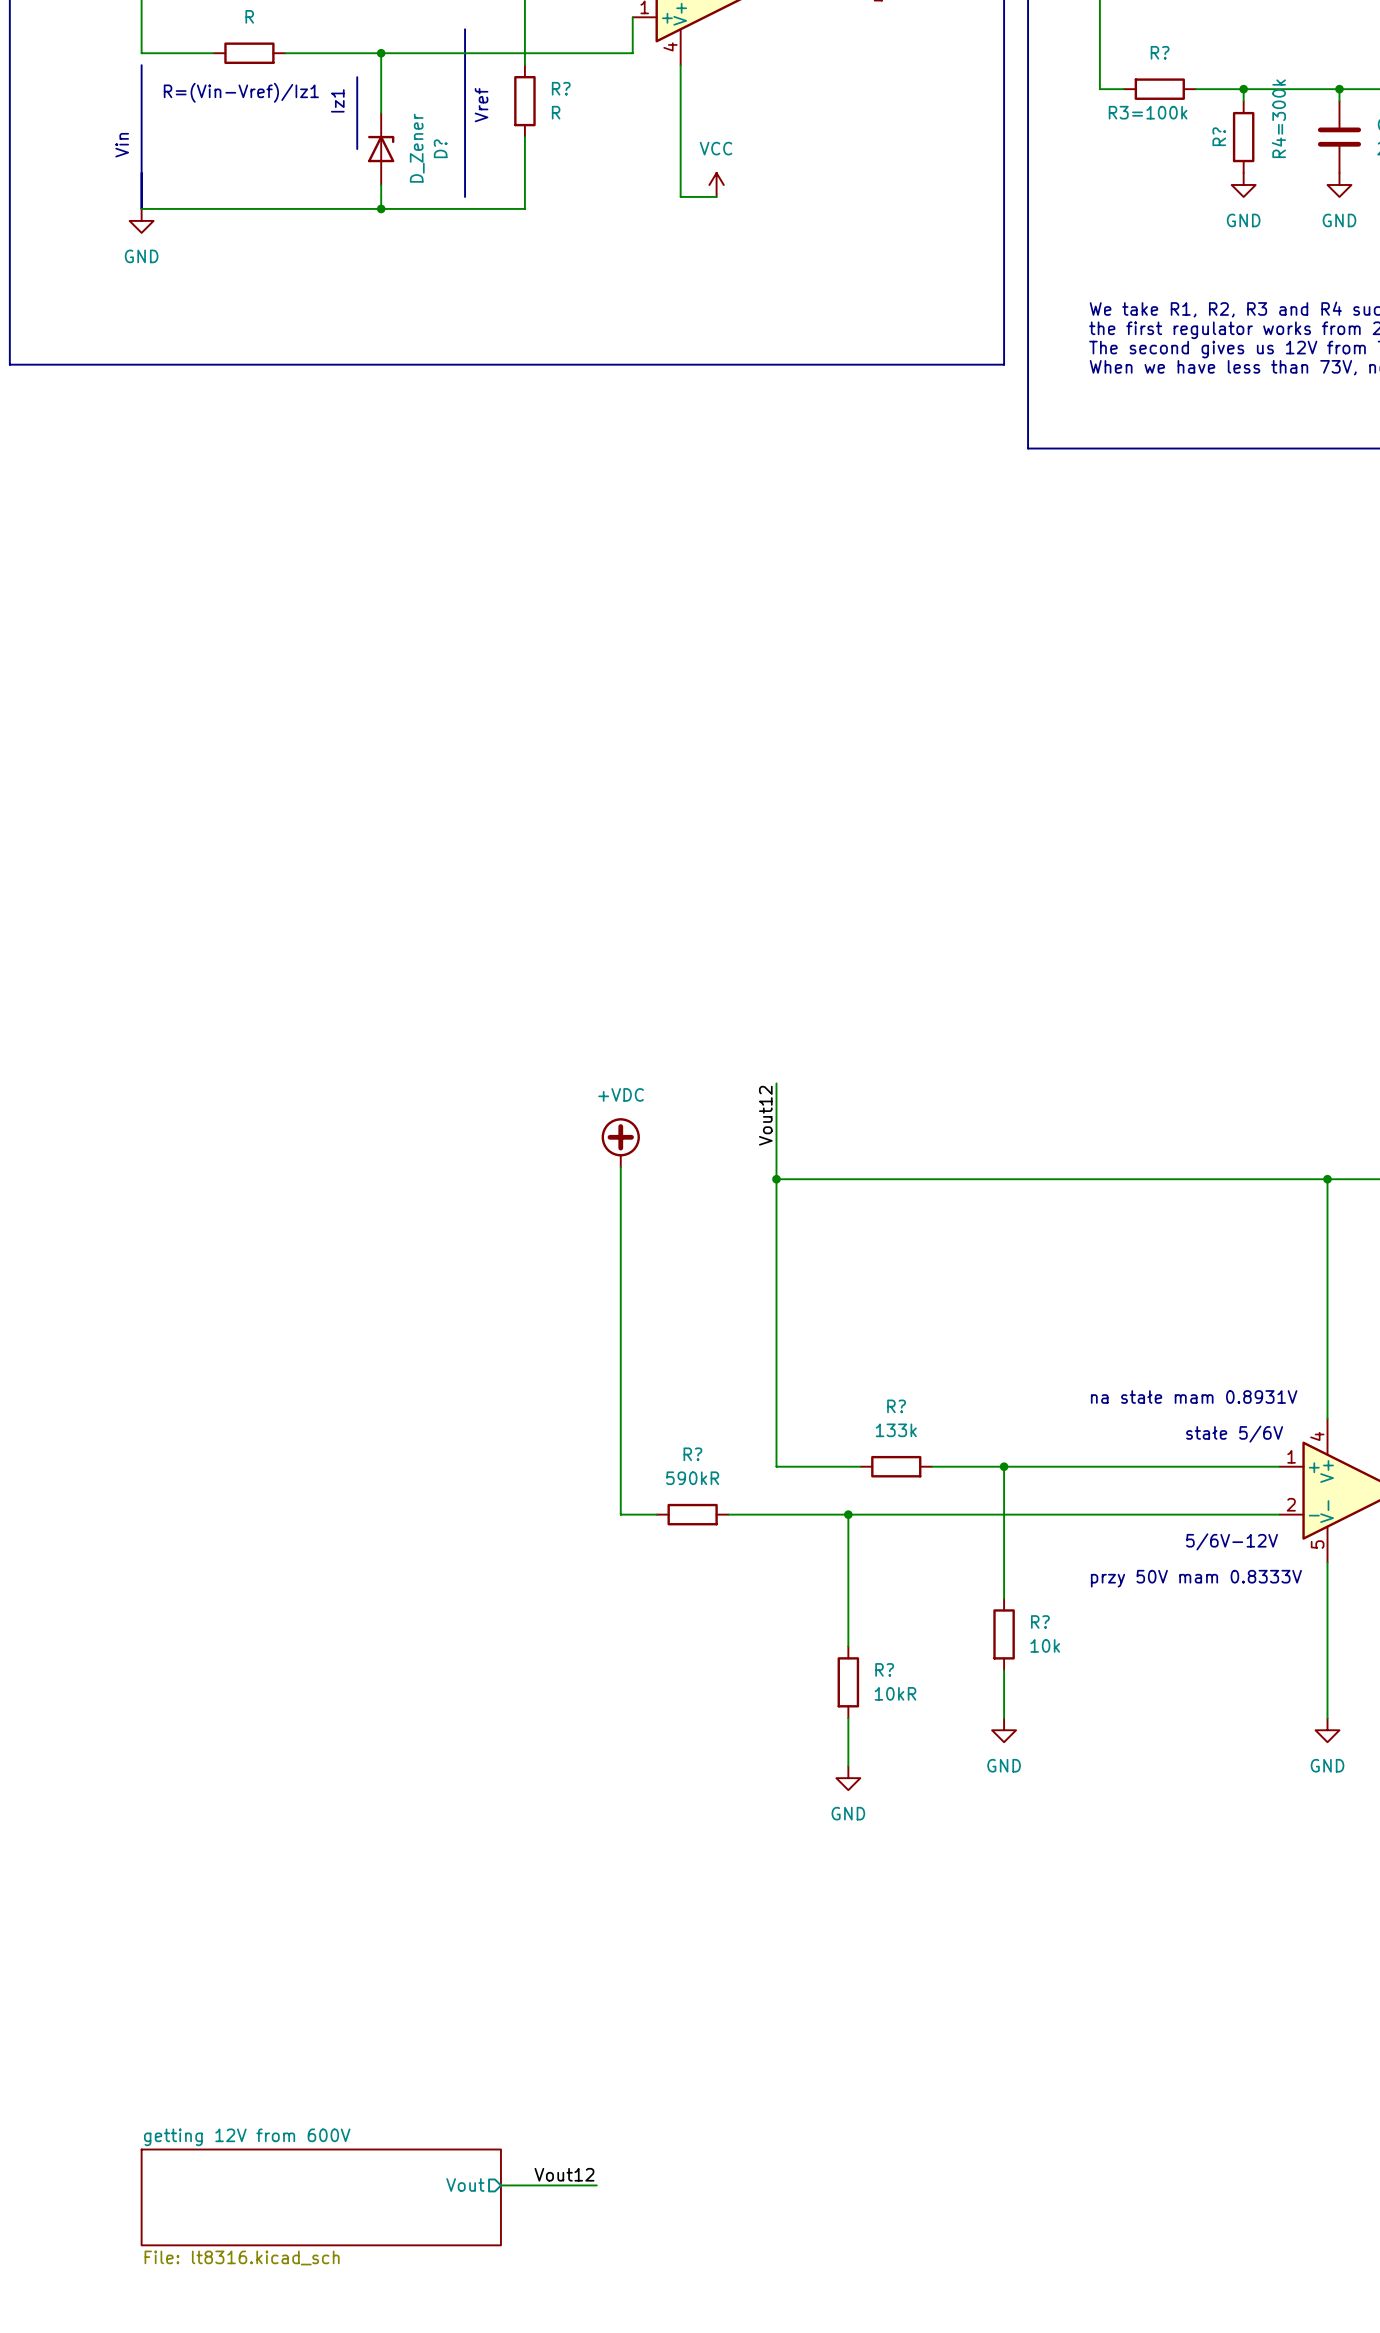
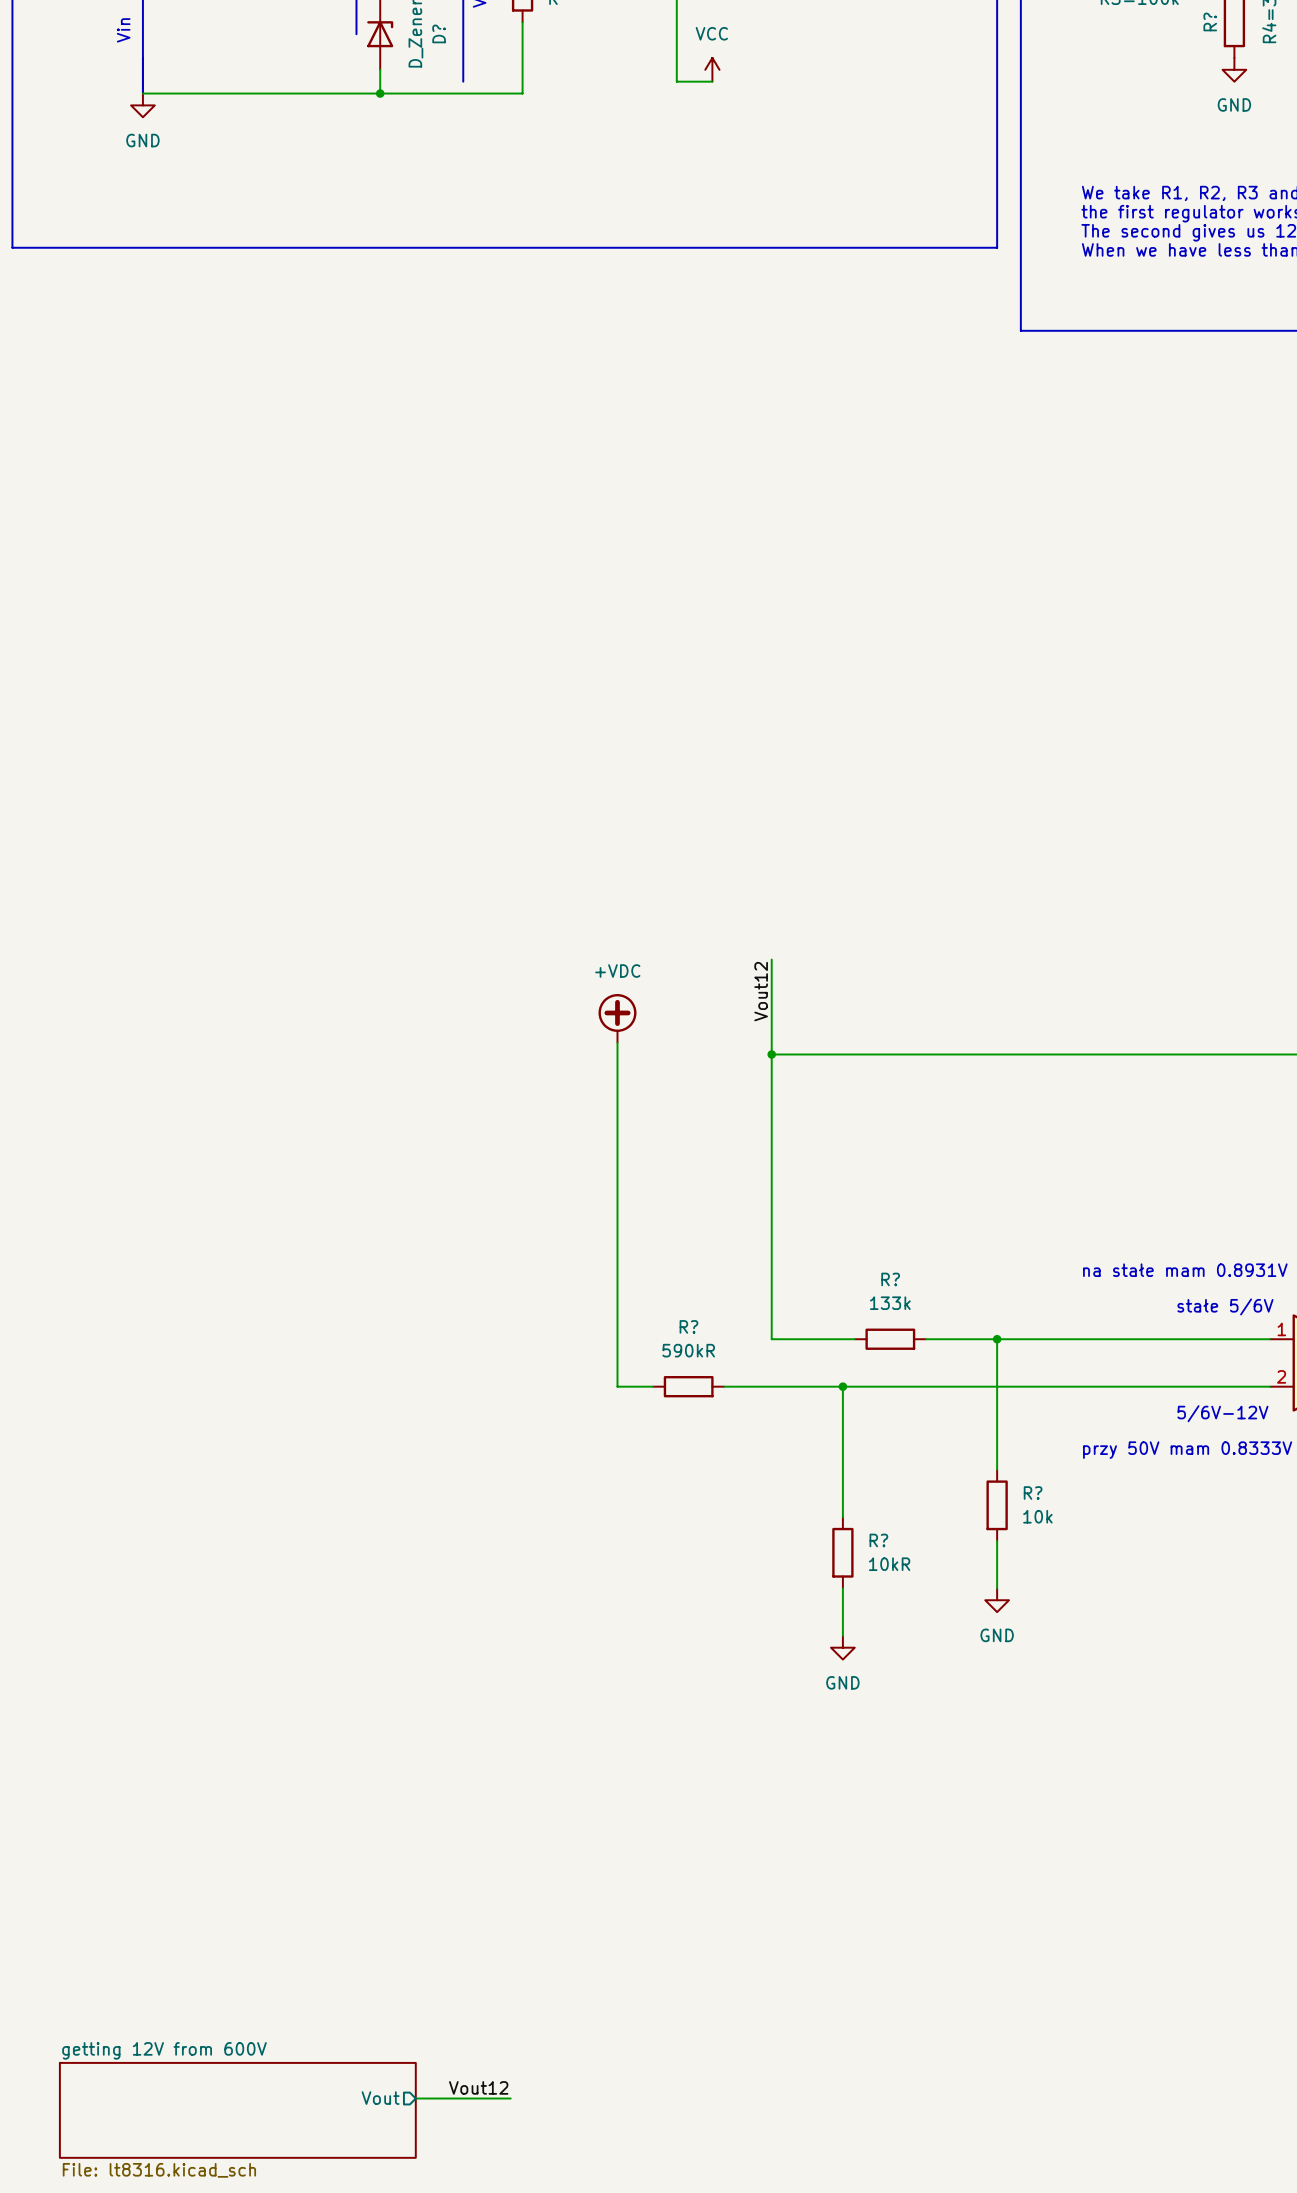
label position: Vout12 (564, 2174) -> Vout12 (478, 2087)
sheet pin position: Vout (465, 2184) -> Vout (380, 2098)
wire: (500, 2185) (596, 2185) -> (415, 2098) (510, 2098)
sheet getting 12V from 600V position: (321, 2197) -> (237, 2110)

